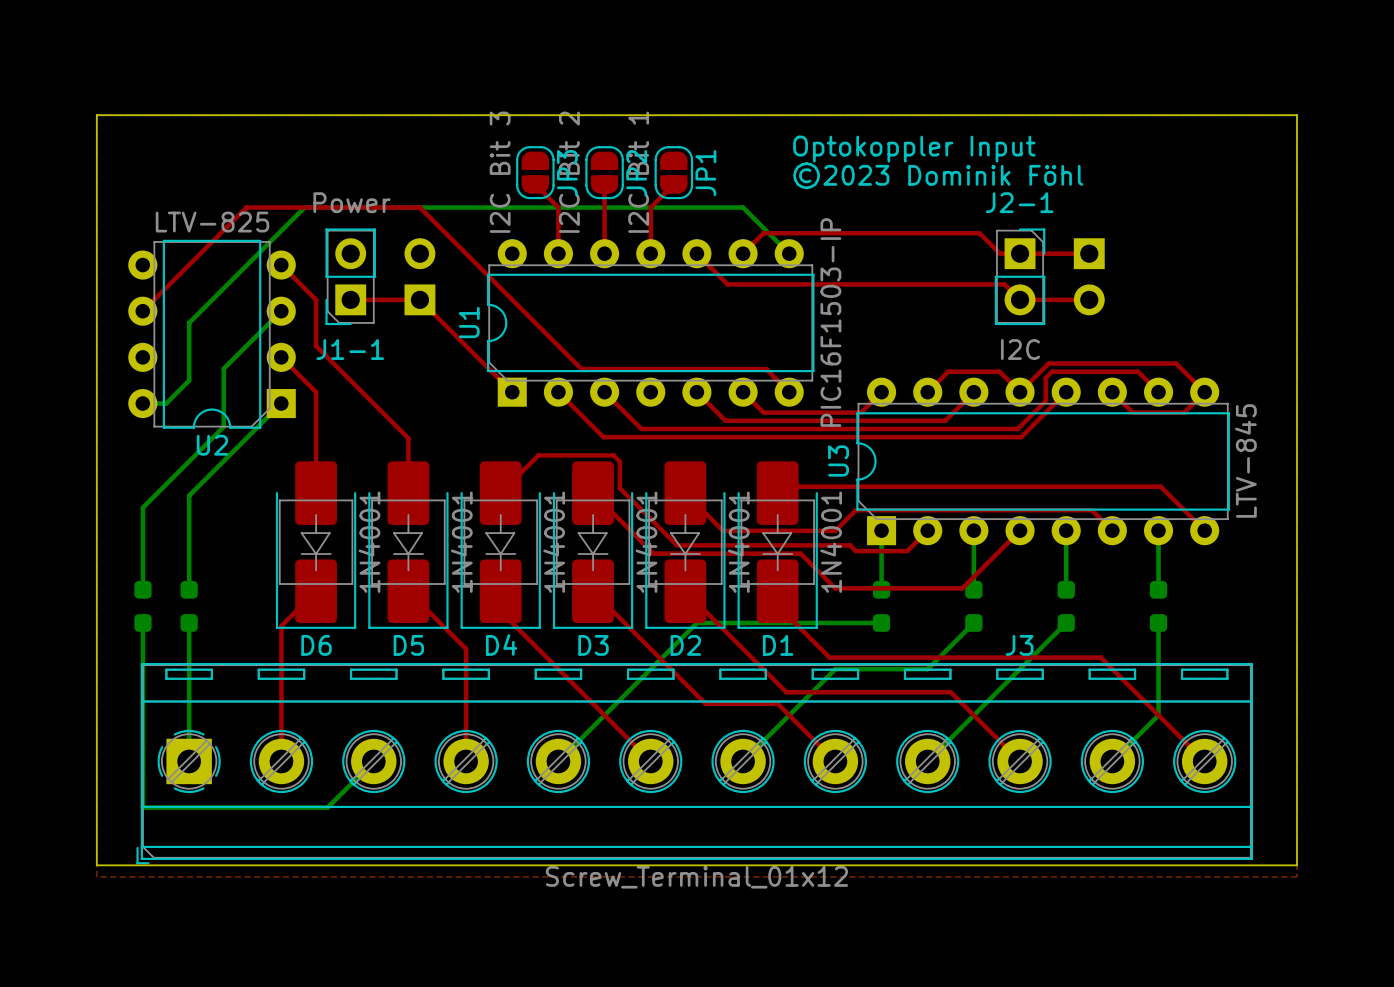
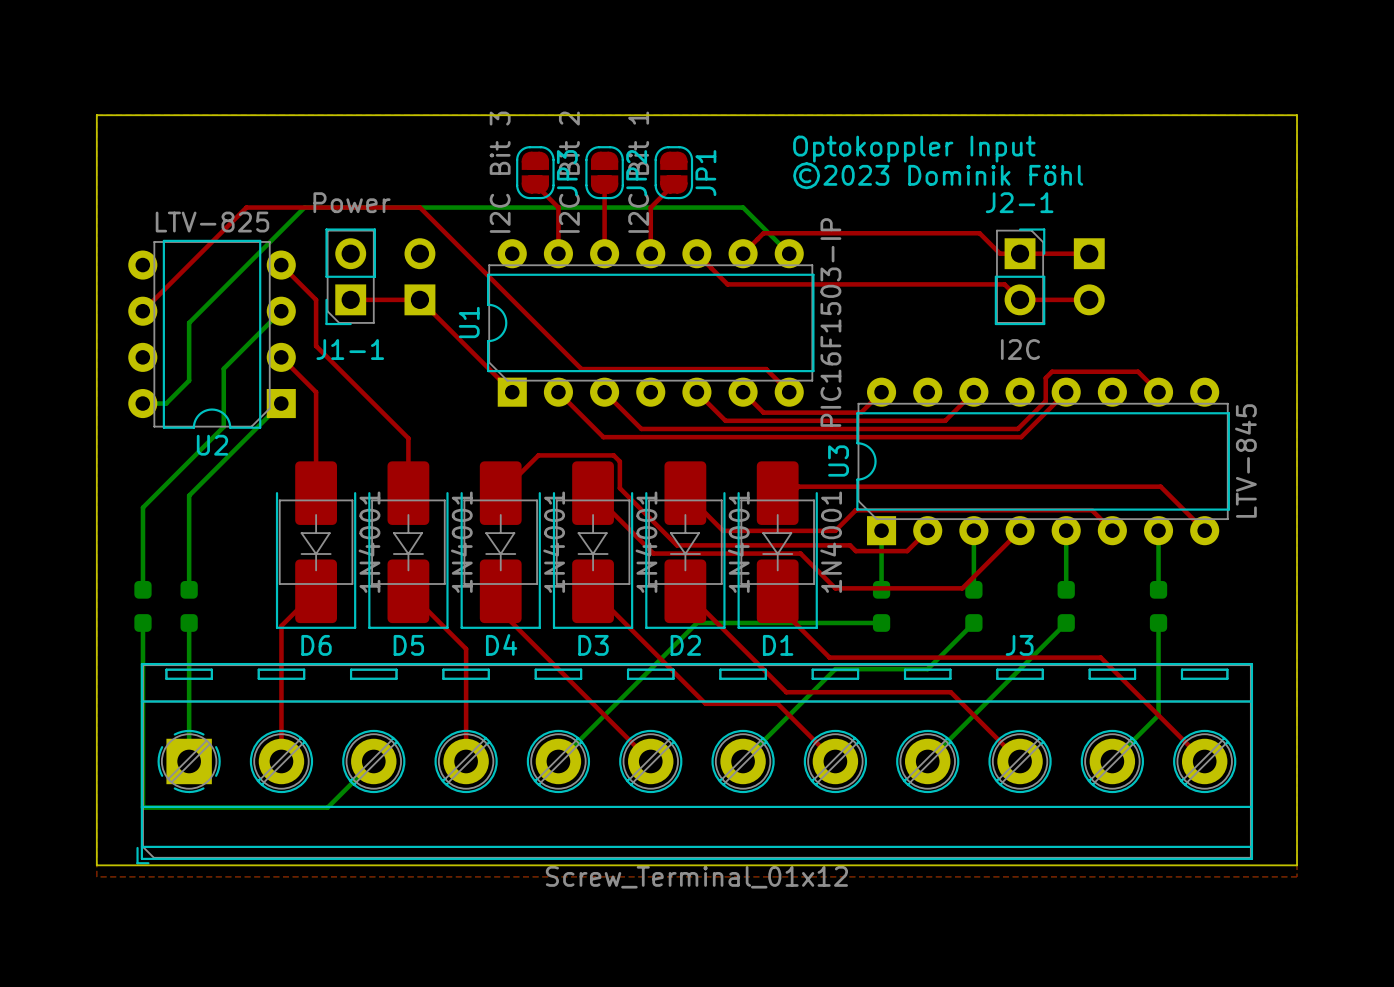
top track: (927, 392) (948, 371) (999, 371) (1020, 392) (1048, 363) (1176, 363) (1204, 392) (1184, 412) (1132, 412) (1112, 392) -> none

